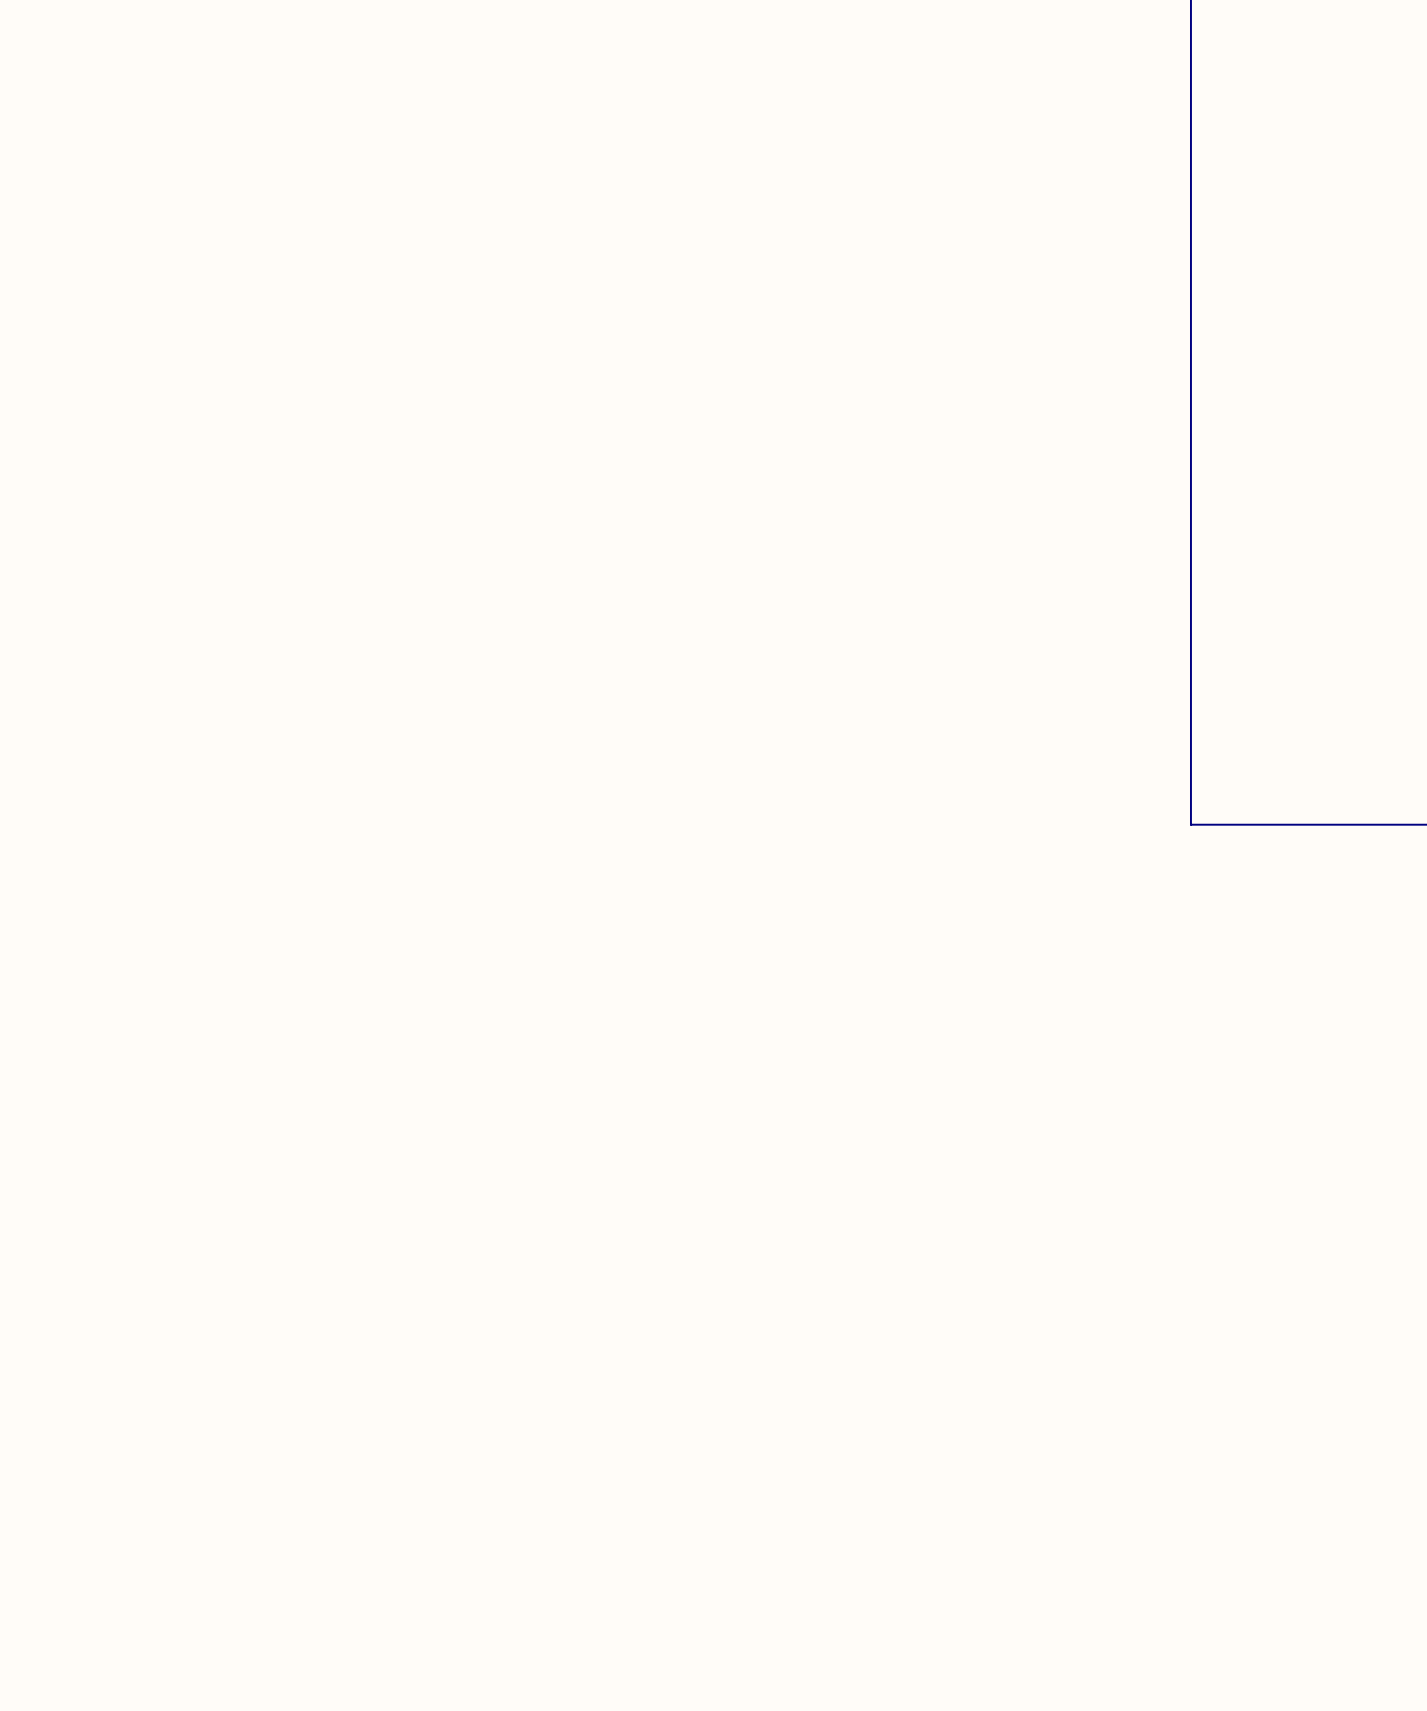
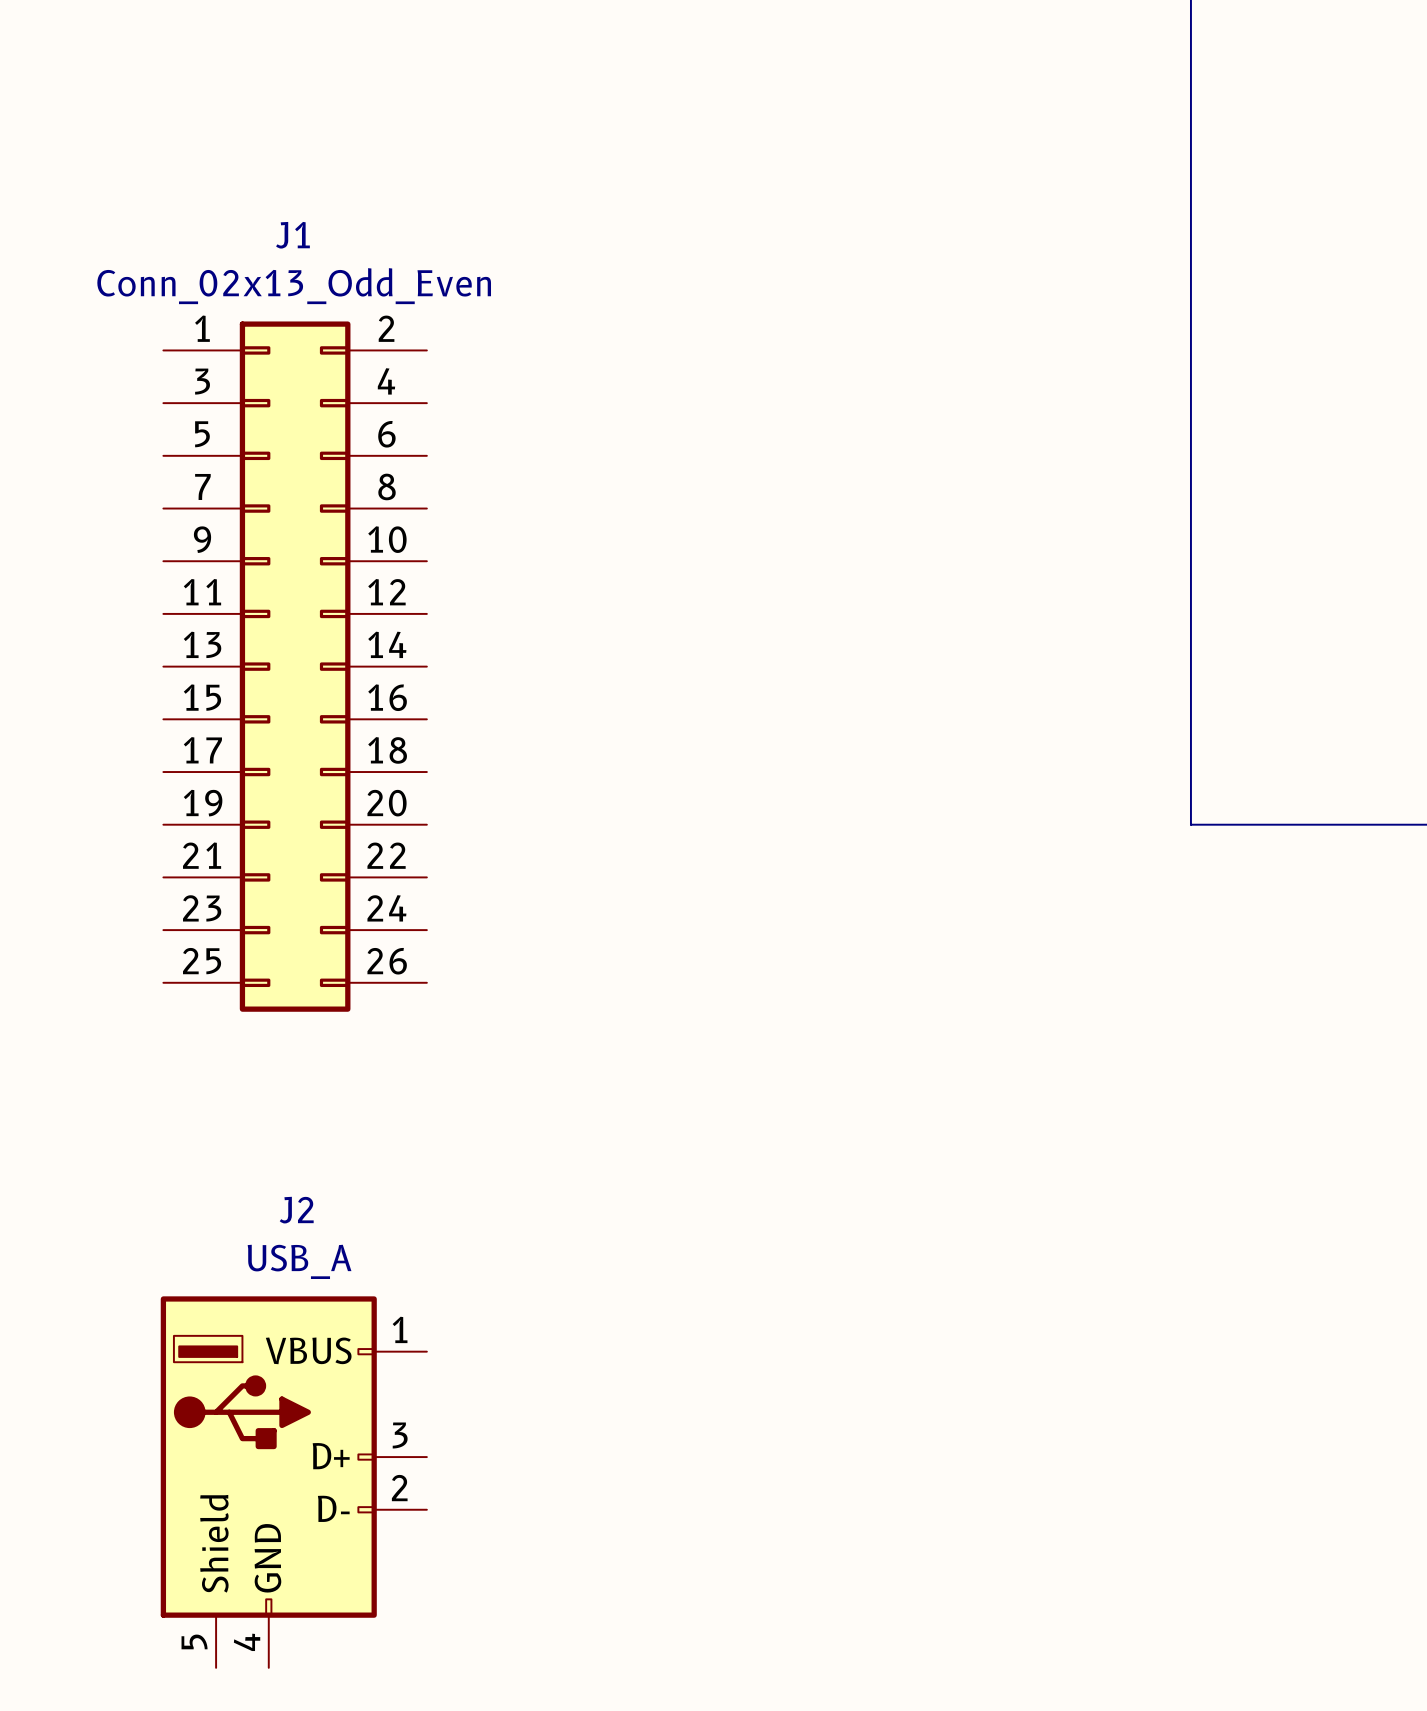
J1: none -> Conn_02x13_Odd_Even (295, 666)
J2: none -> USB_A (293, 1482)

